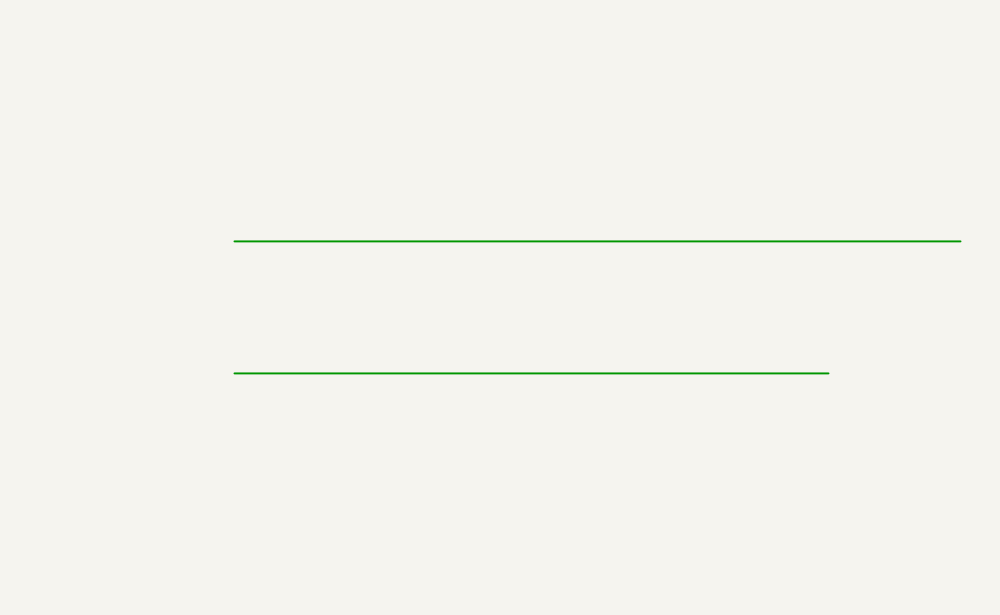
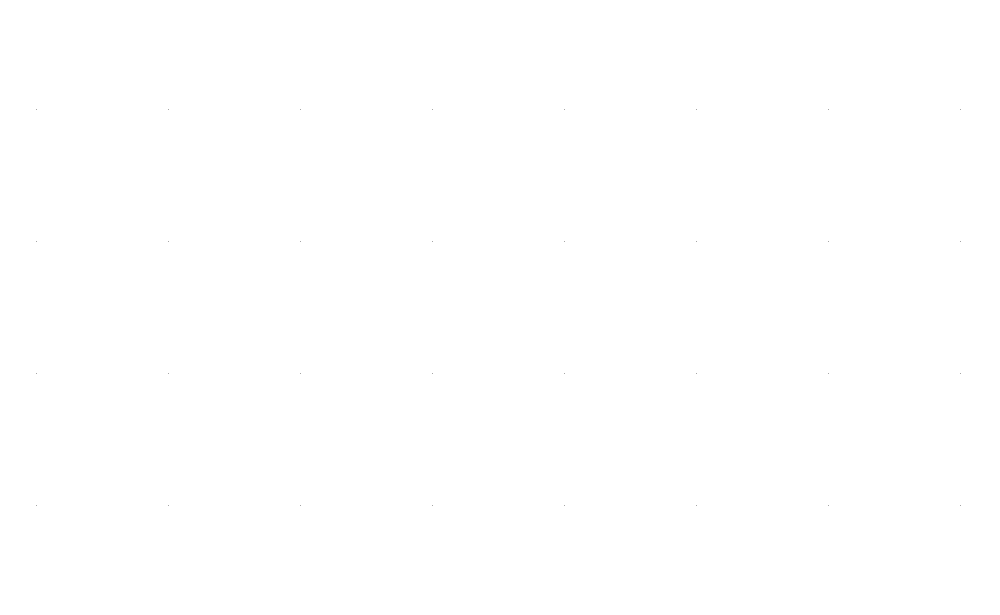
wire: (234, 241) (960, 241) -> none
wire: (234, 373) (828, 373) -> none

